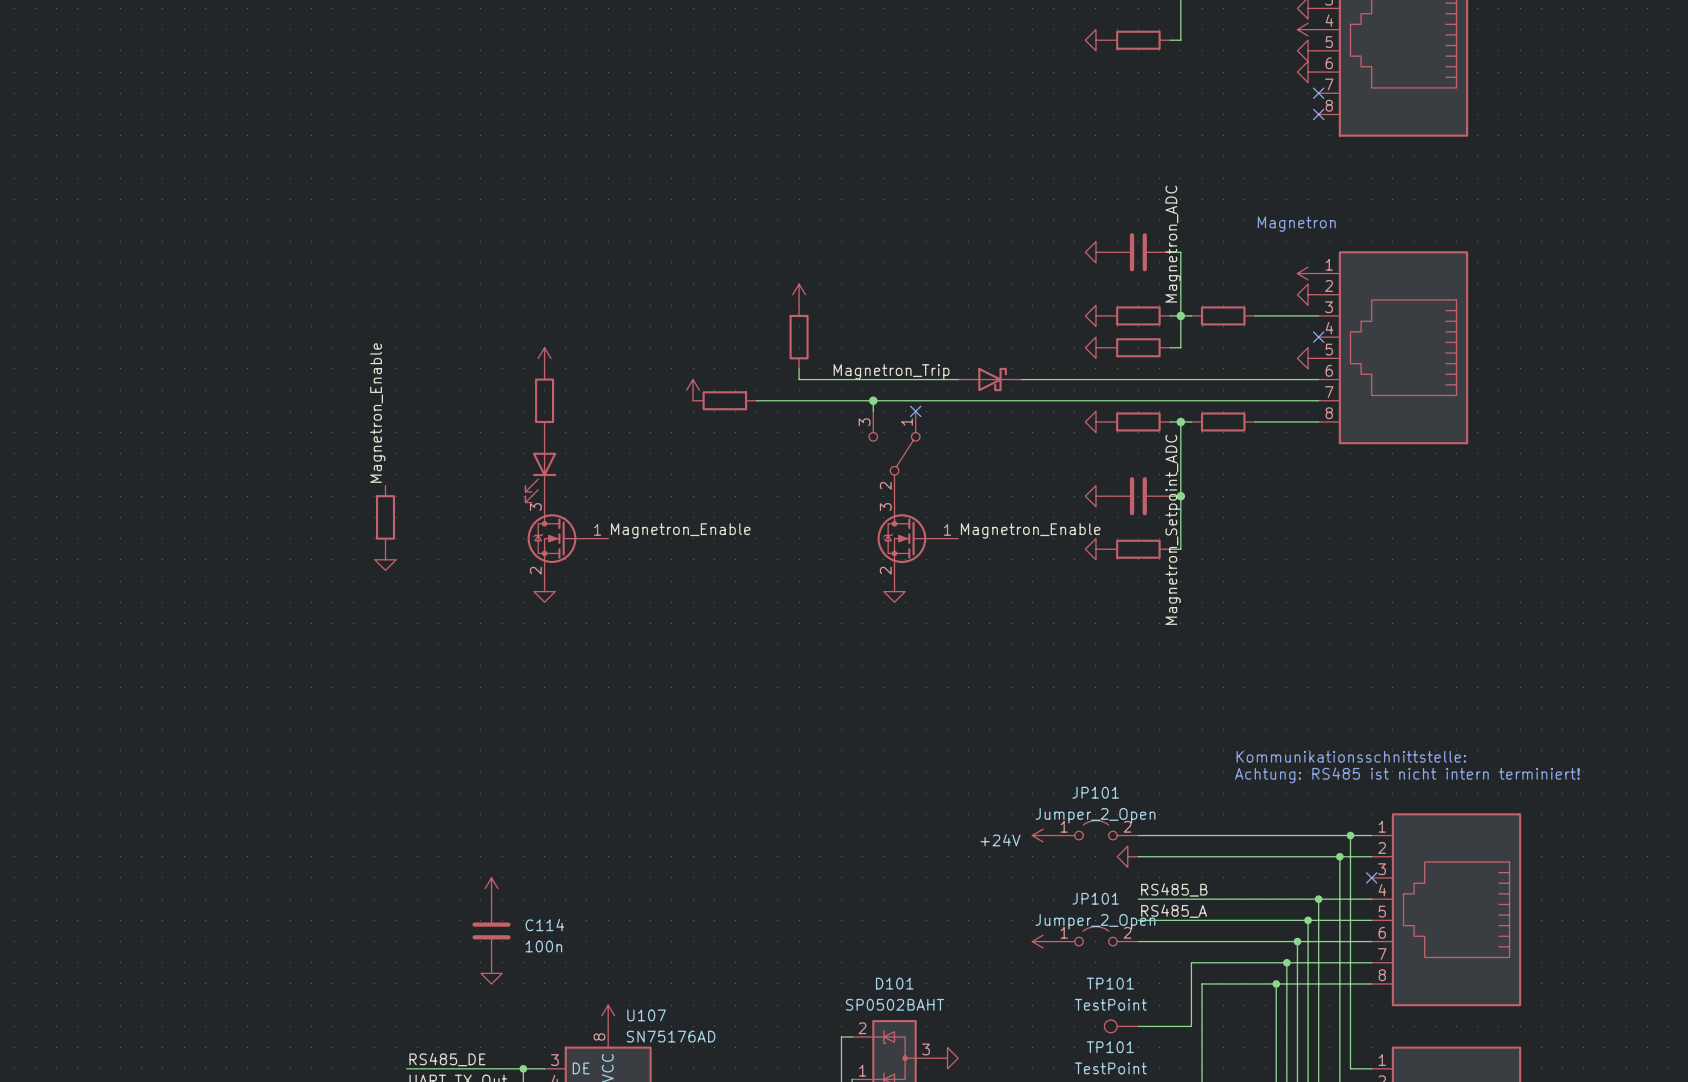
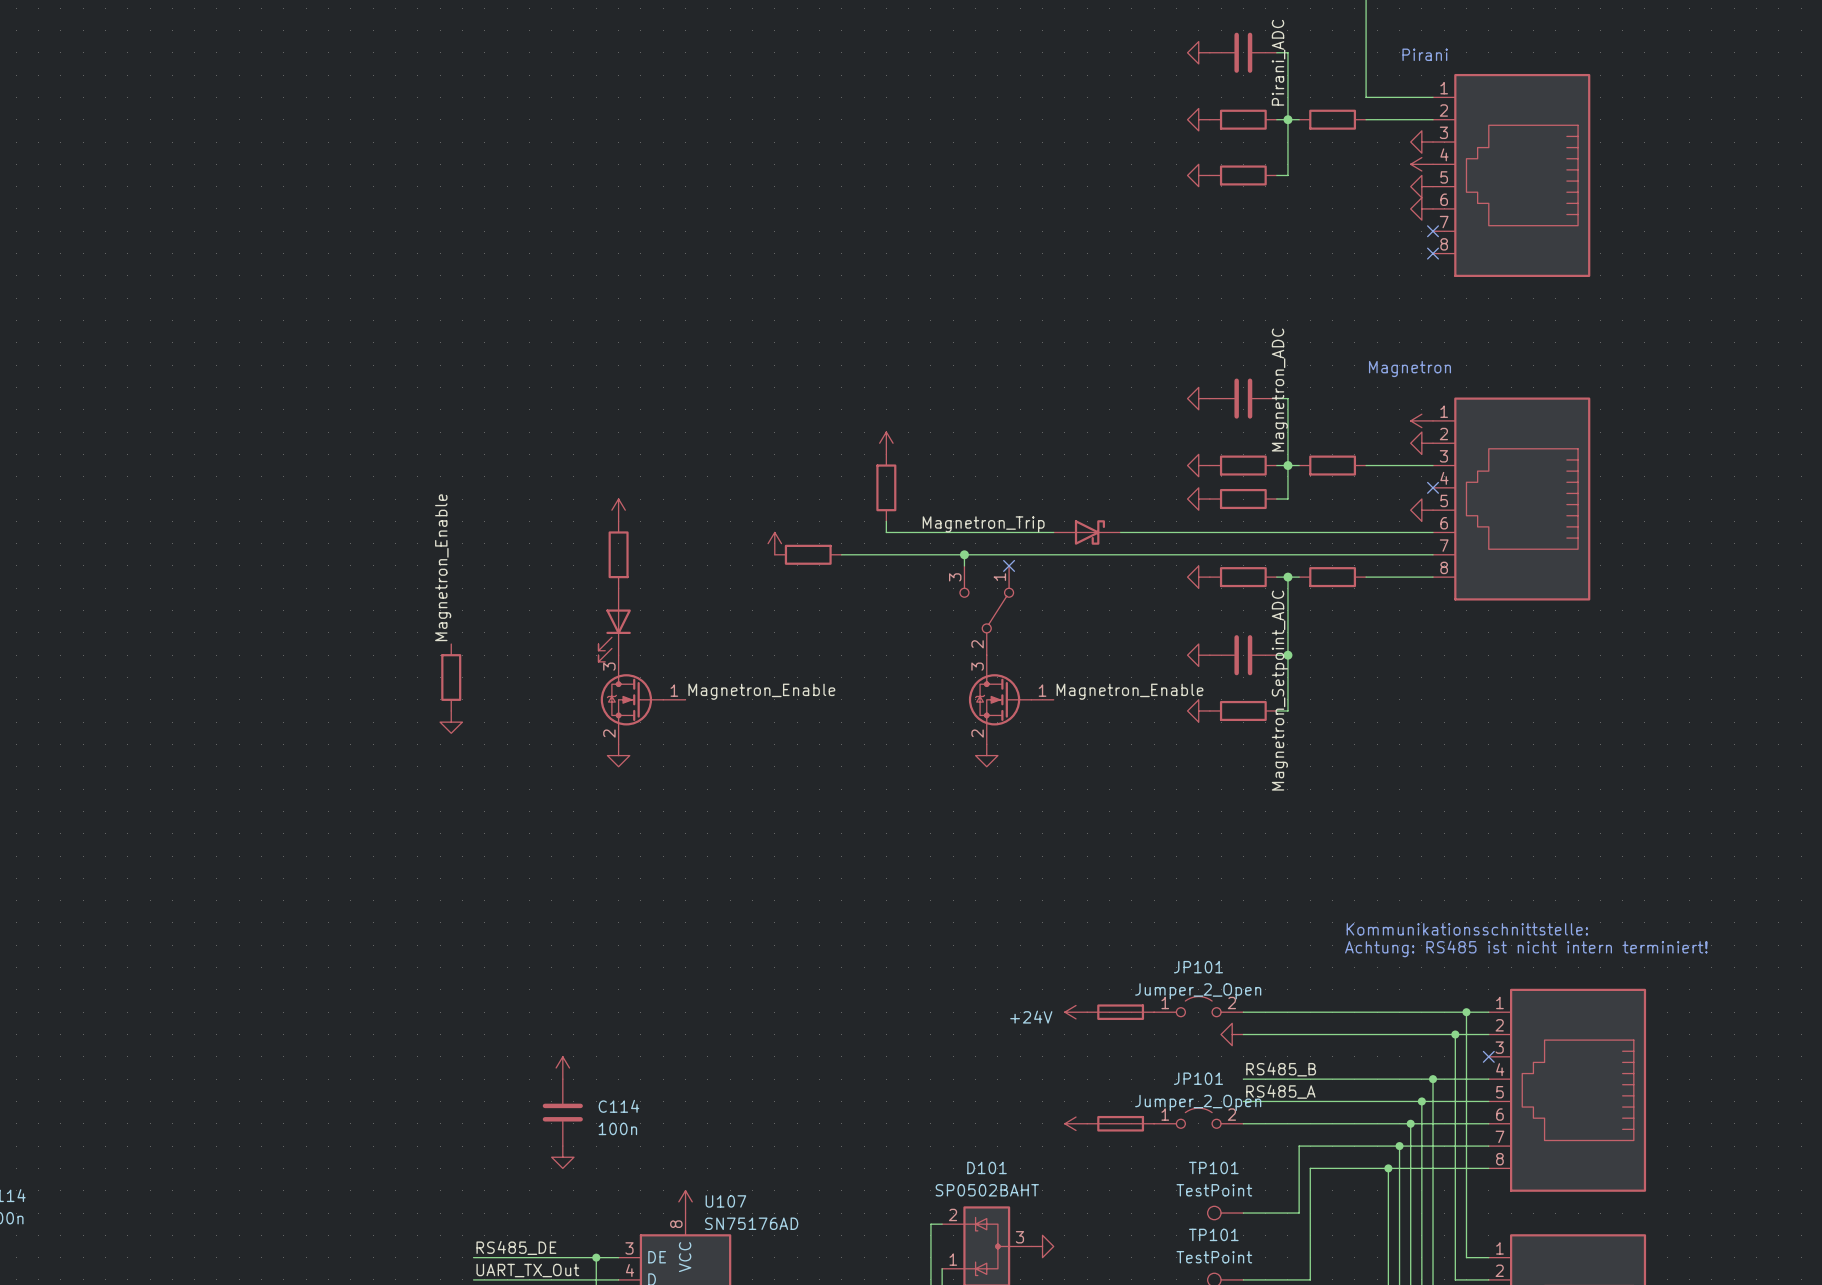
part: none -> (1120, 1012)
power symbol position: +24V (1042, 835) -> +24V (1076, 1012)
part: none -> (1120, 1123)
power symbol position: (1042, 941) -> (1076, 1123)

